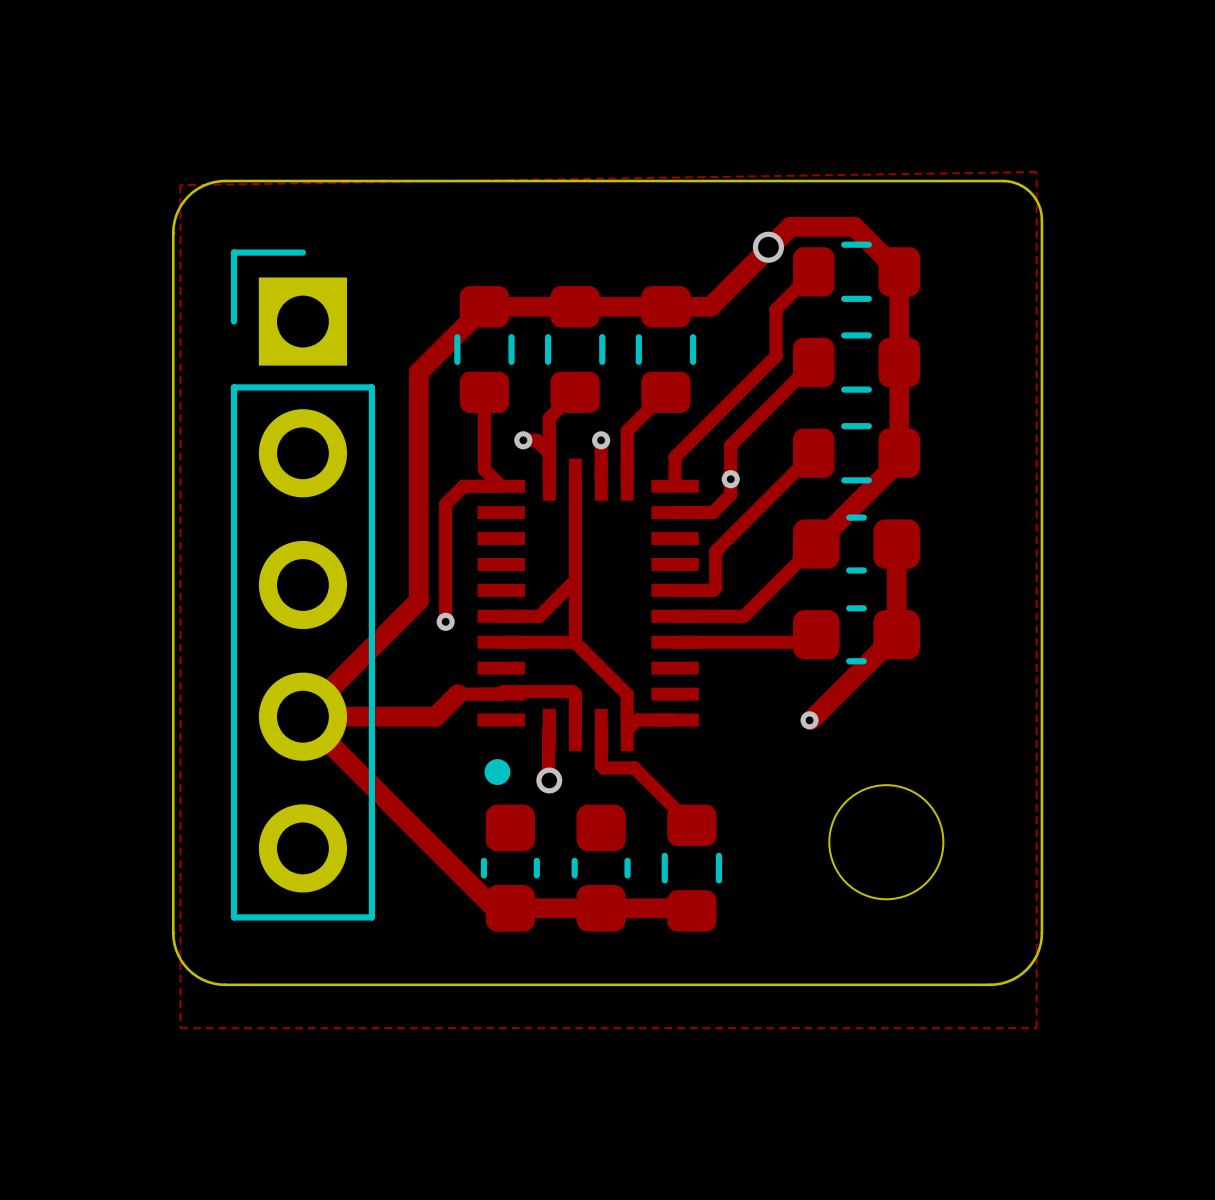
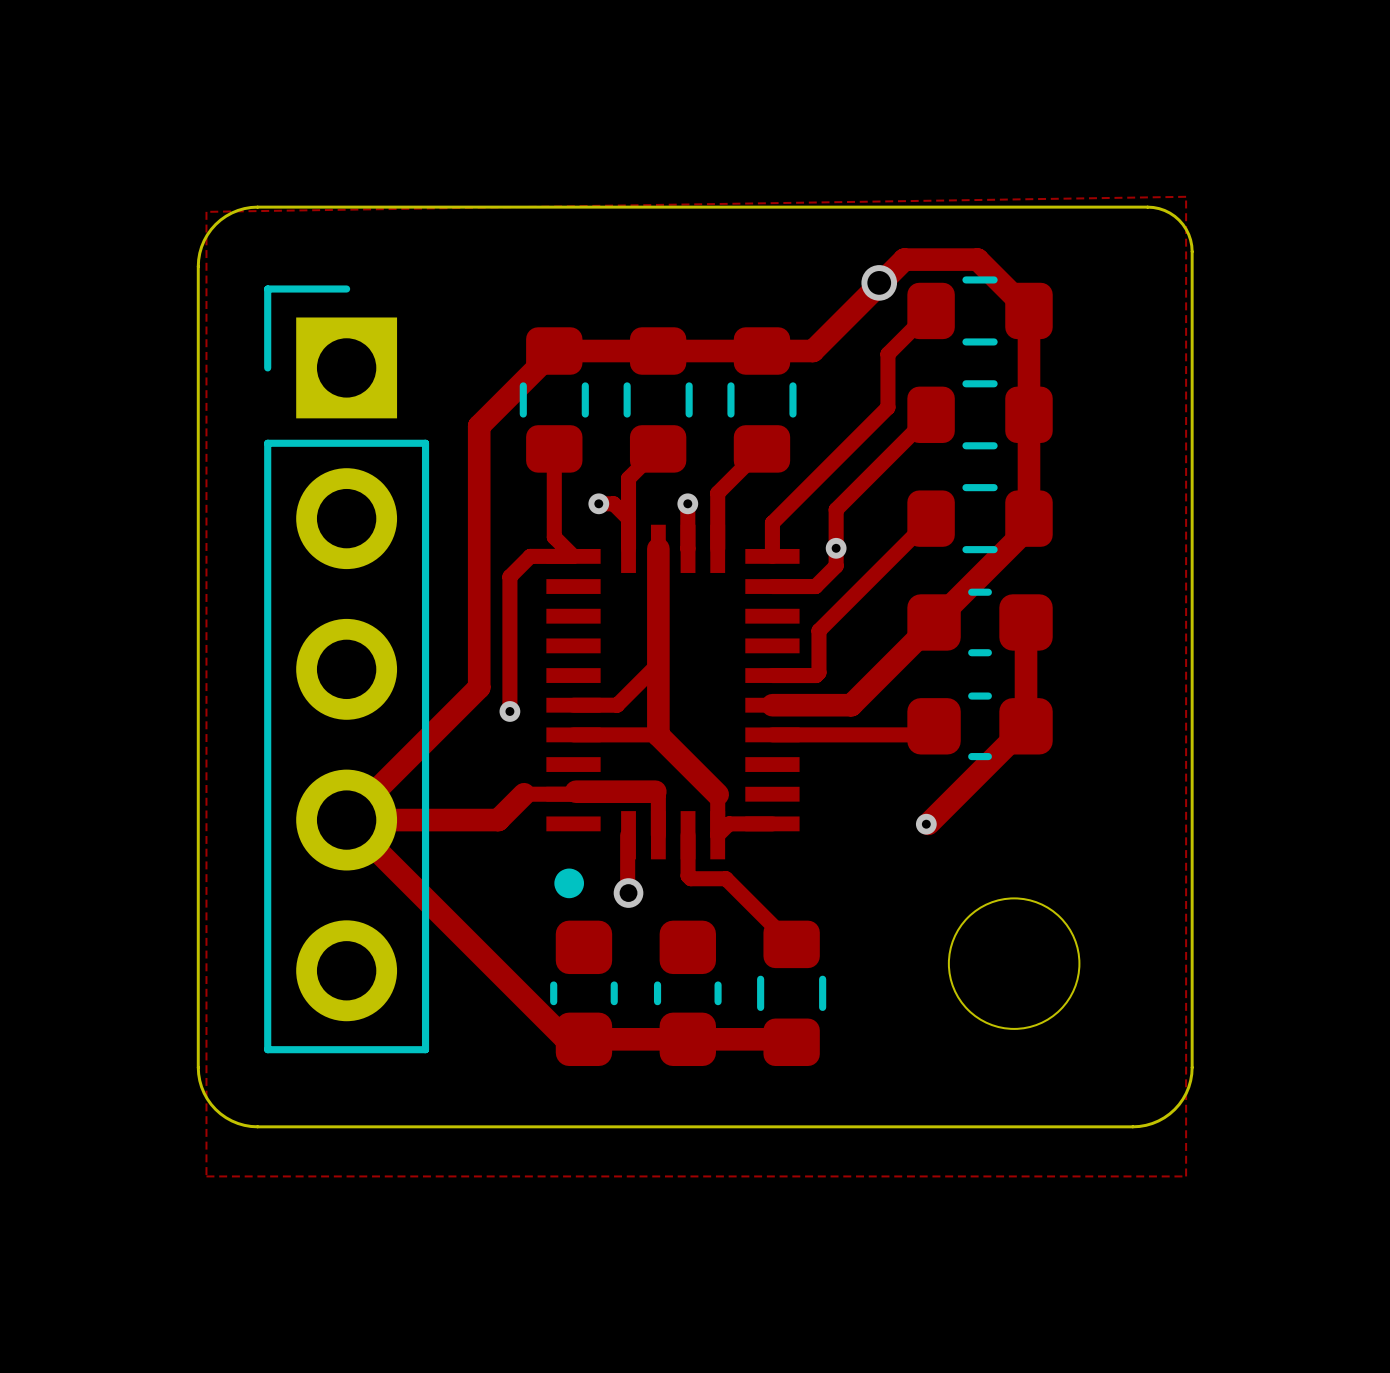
track width: thin (575, 479) (575, 642) -> thick (658, 548) (658, 735)
track width: thin (816, 544) (744, 616) (675, 616) -> thick (934, 622) (851, 705) (772, 705)
track width: thin (575, 642) (627, 694) -> thick (658, 734) (717, 794)
track width: thin (503, 691) (572, 691) -> thick (576, 791) (655, 791)

